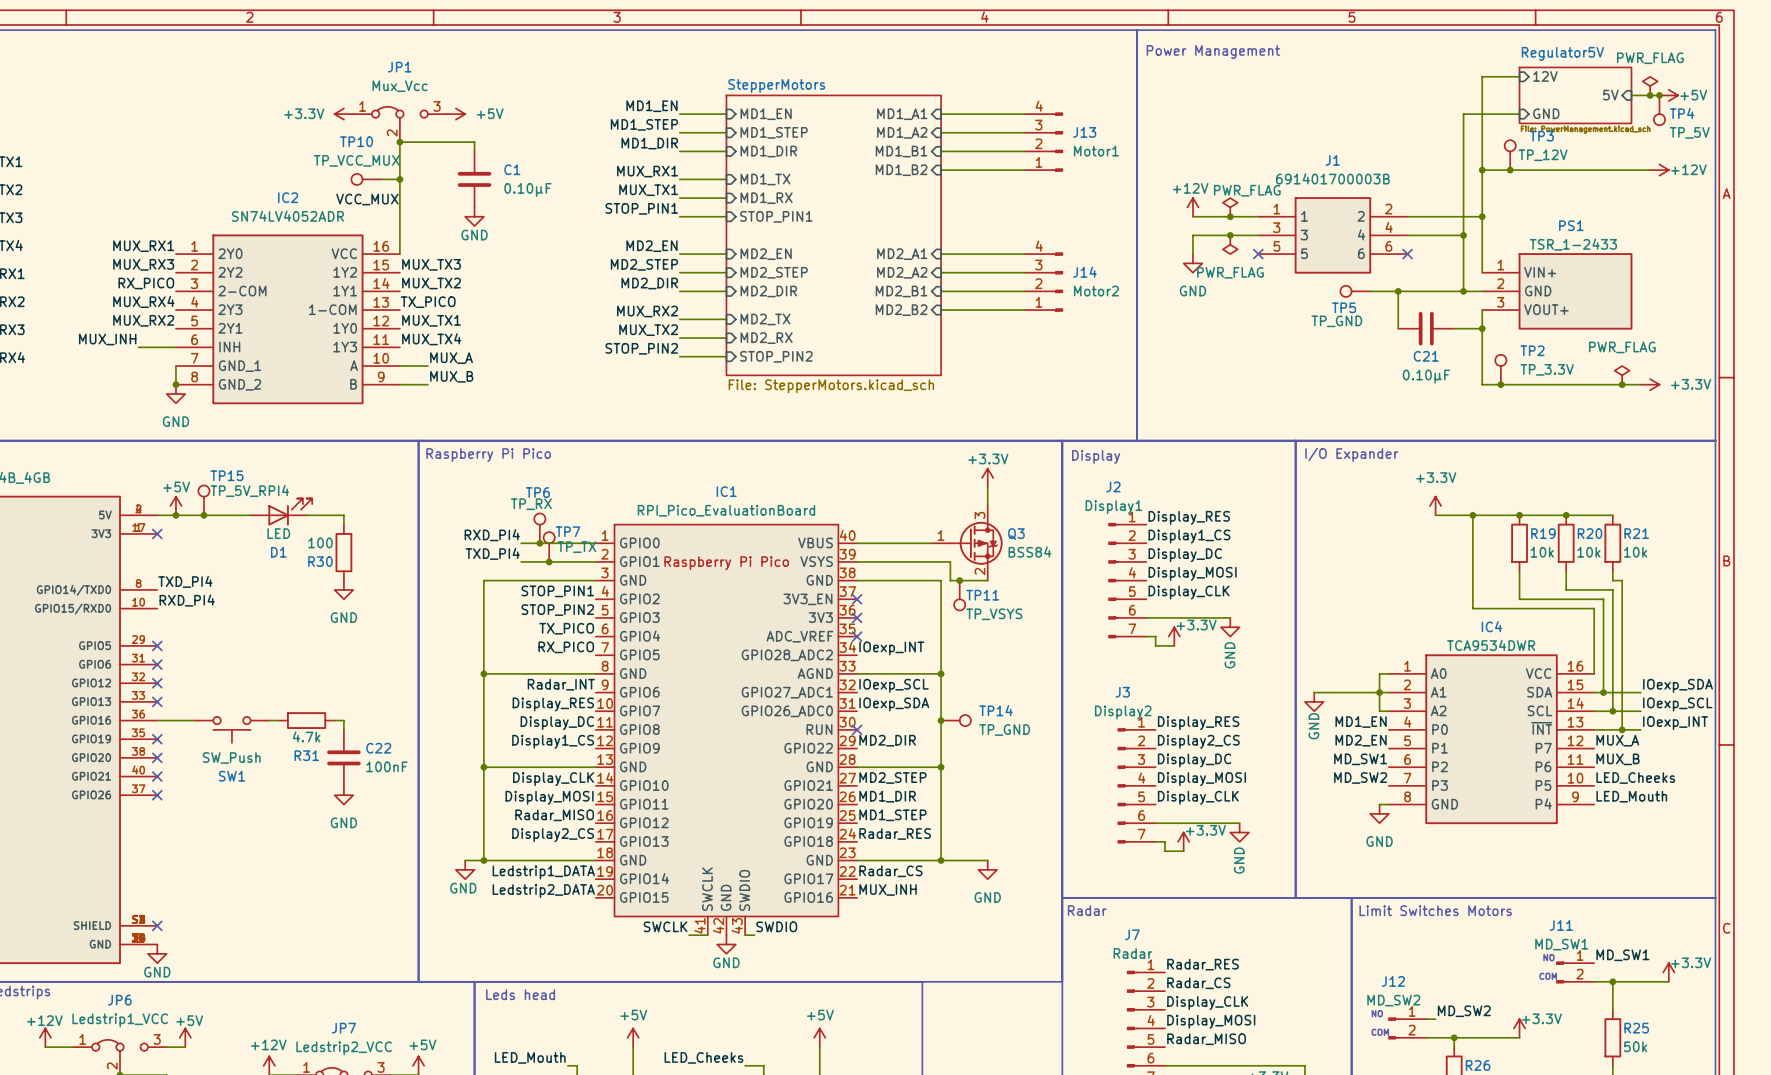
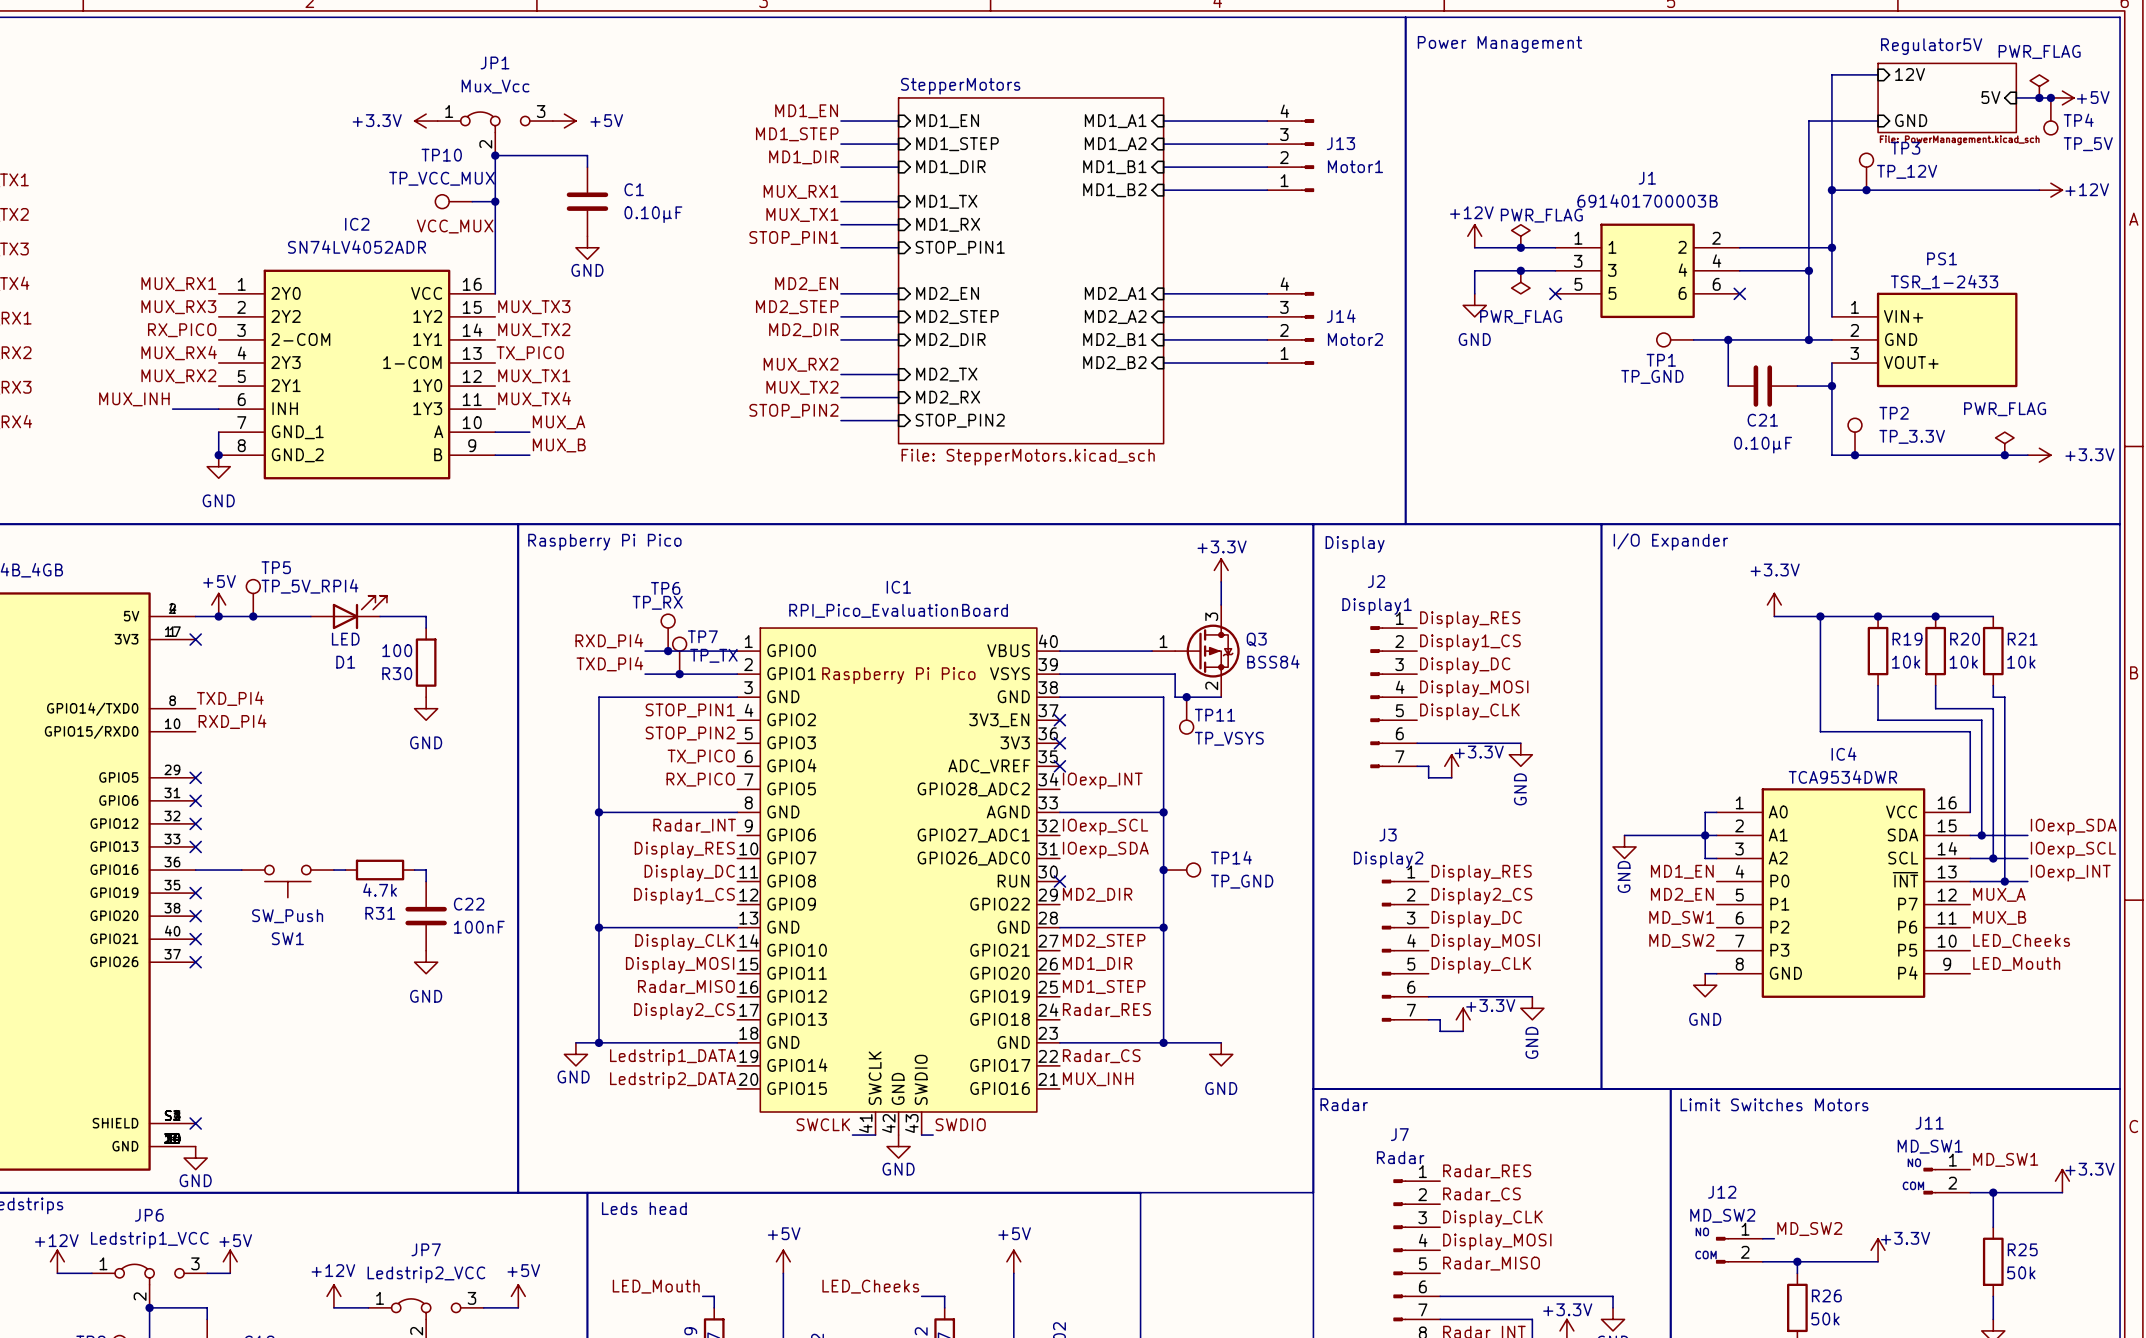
TP5 name: TP5 (1344, 307) -> TP1 (1661, 360)
TP15 name: TP15 (226, 475) -> TP5 (276, 567)

